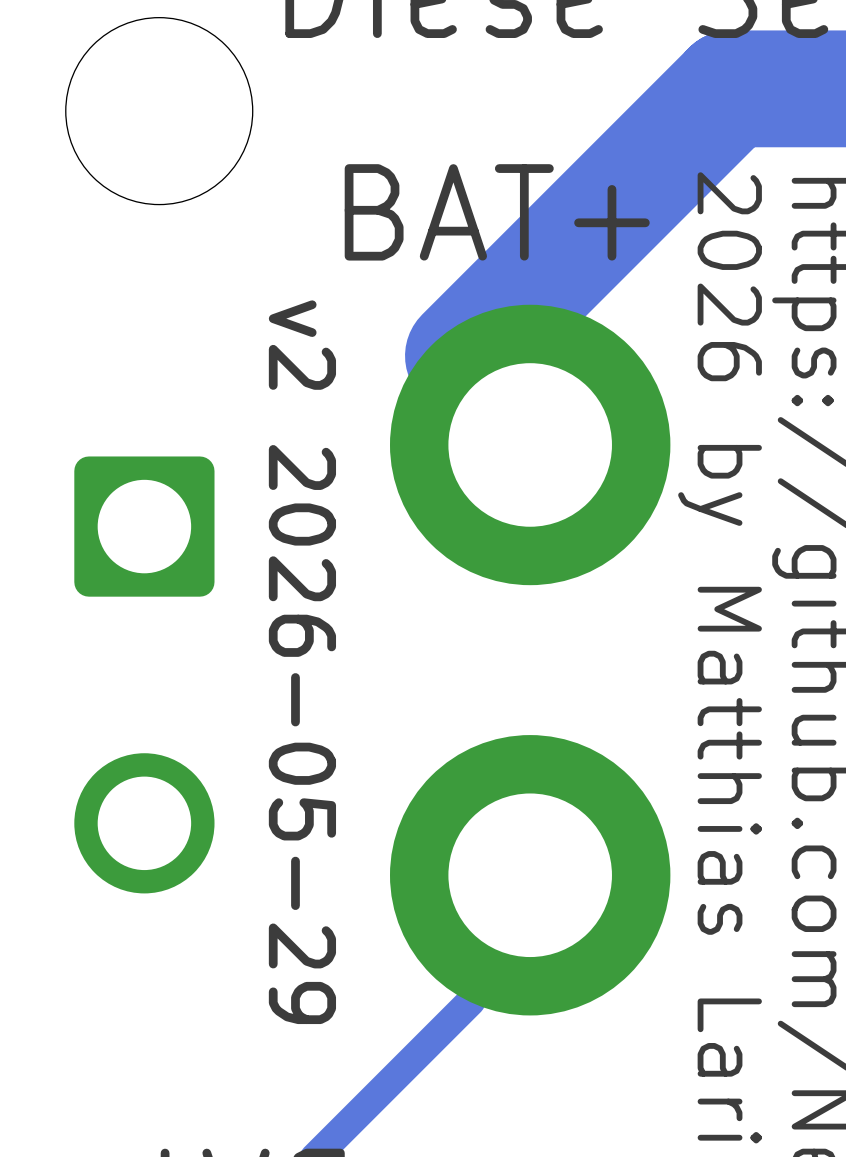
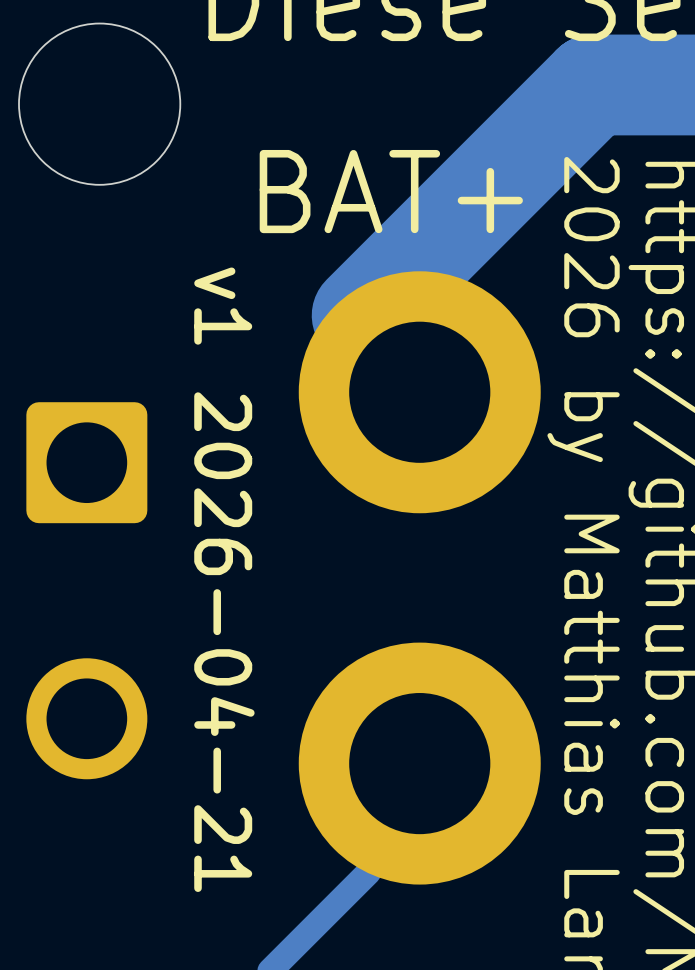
text: v2 2026-05-29 (302, 662) -> v1 2026-04-21 (224, 579)

